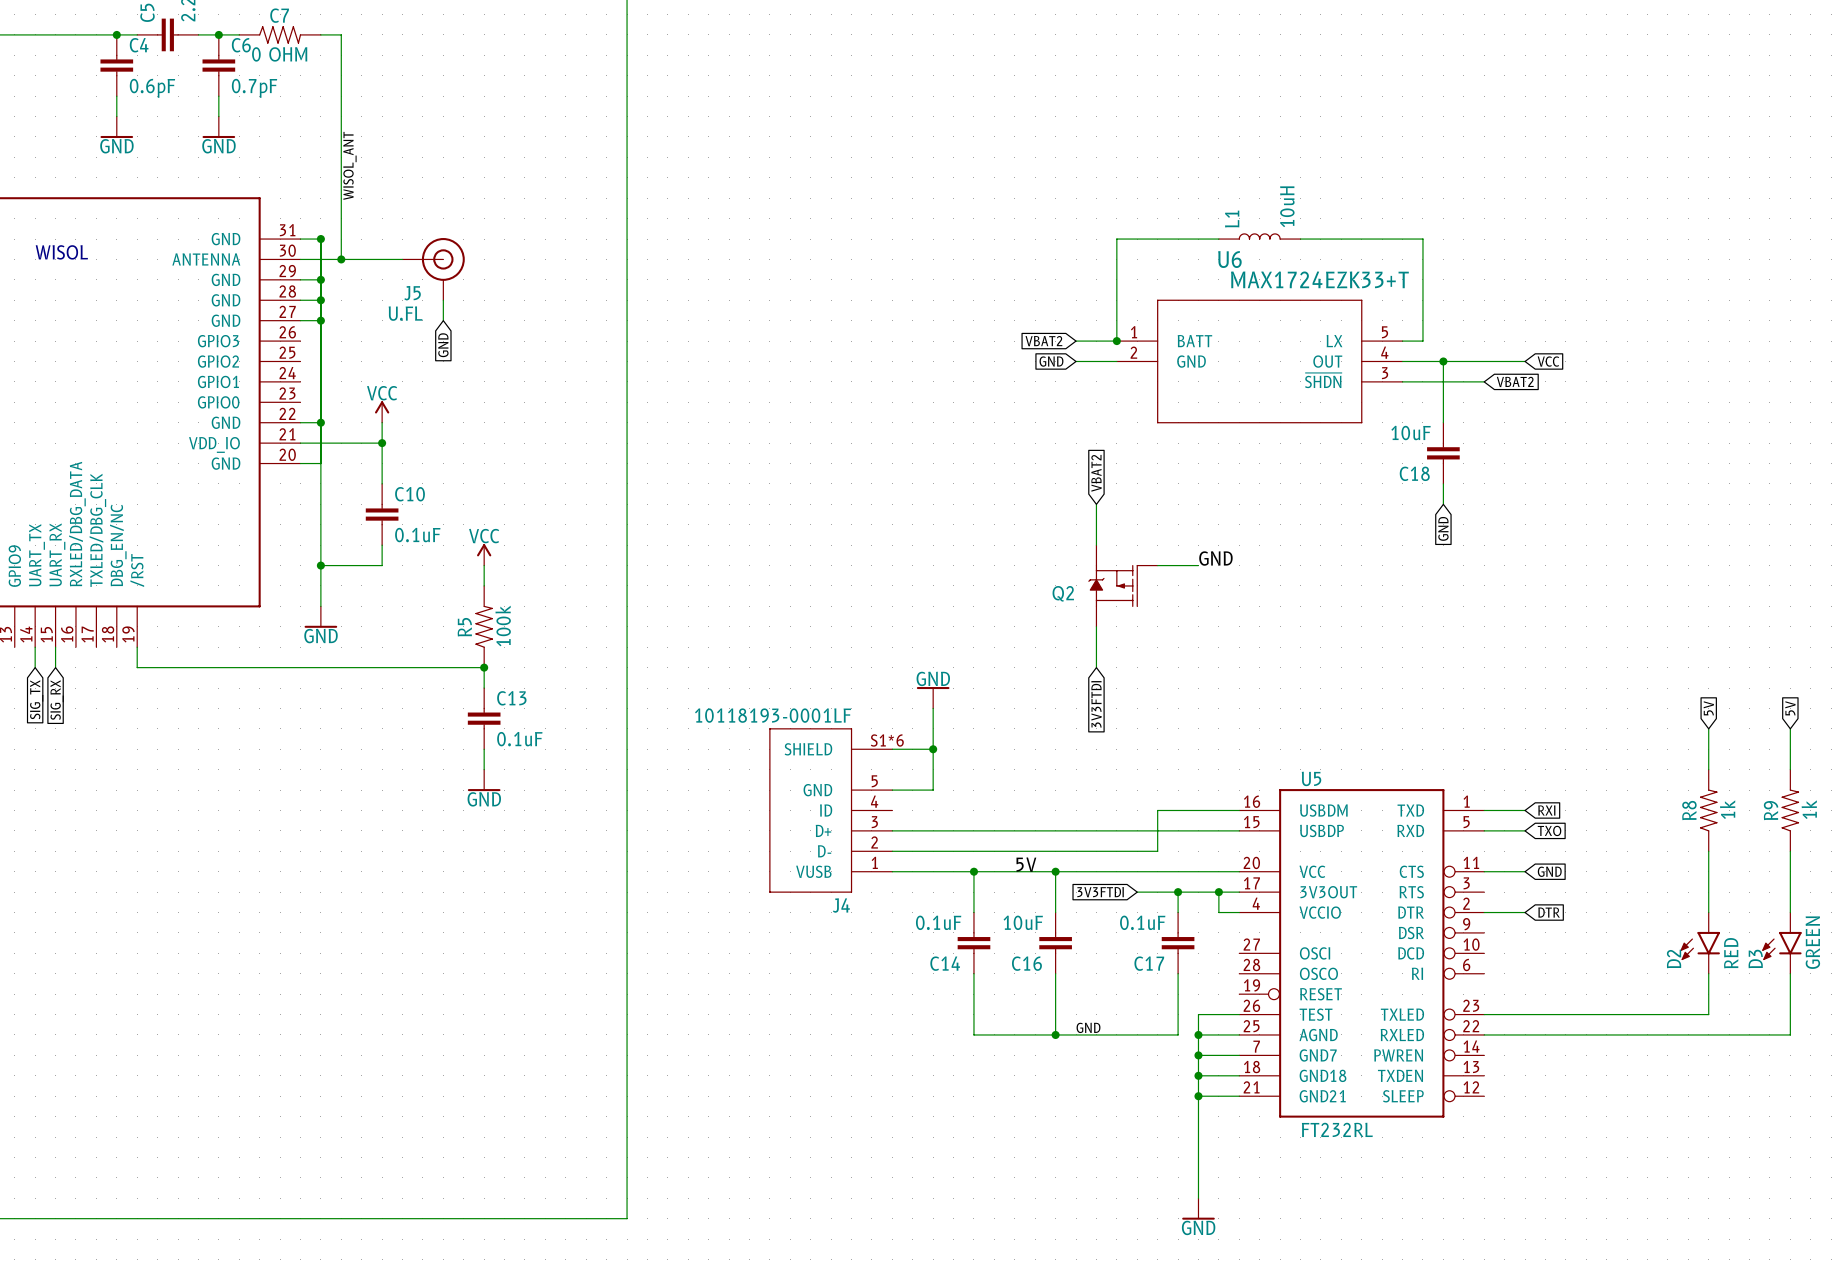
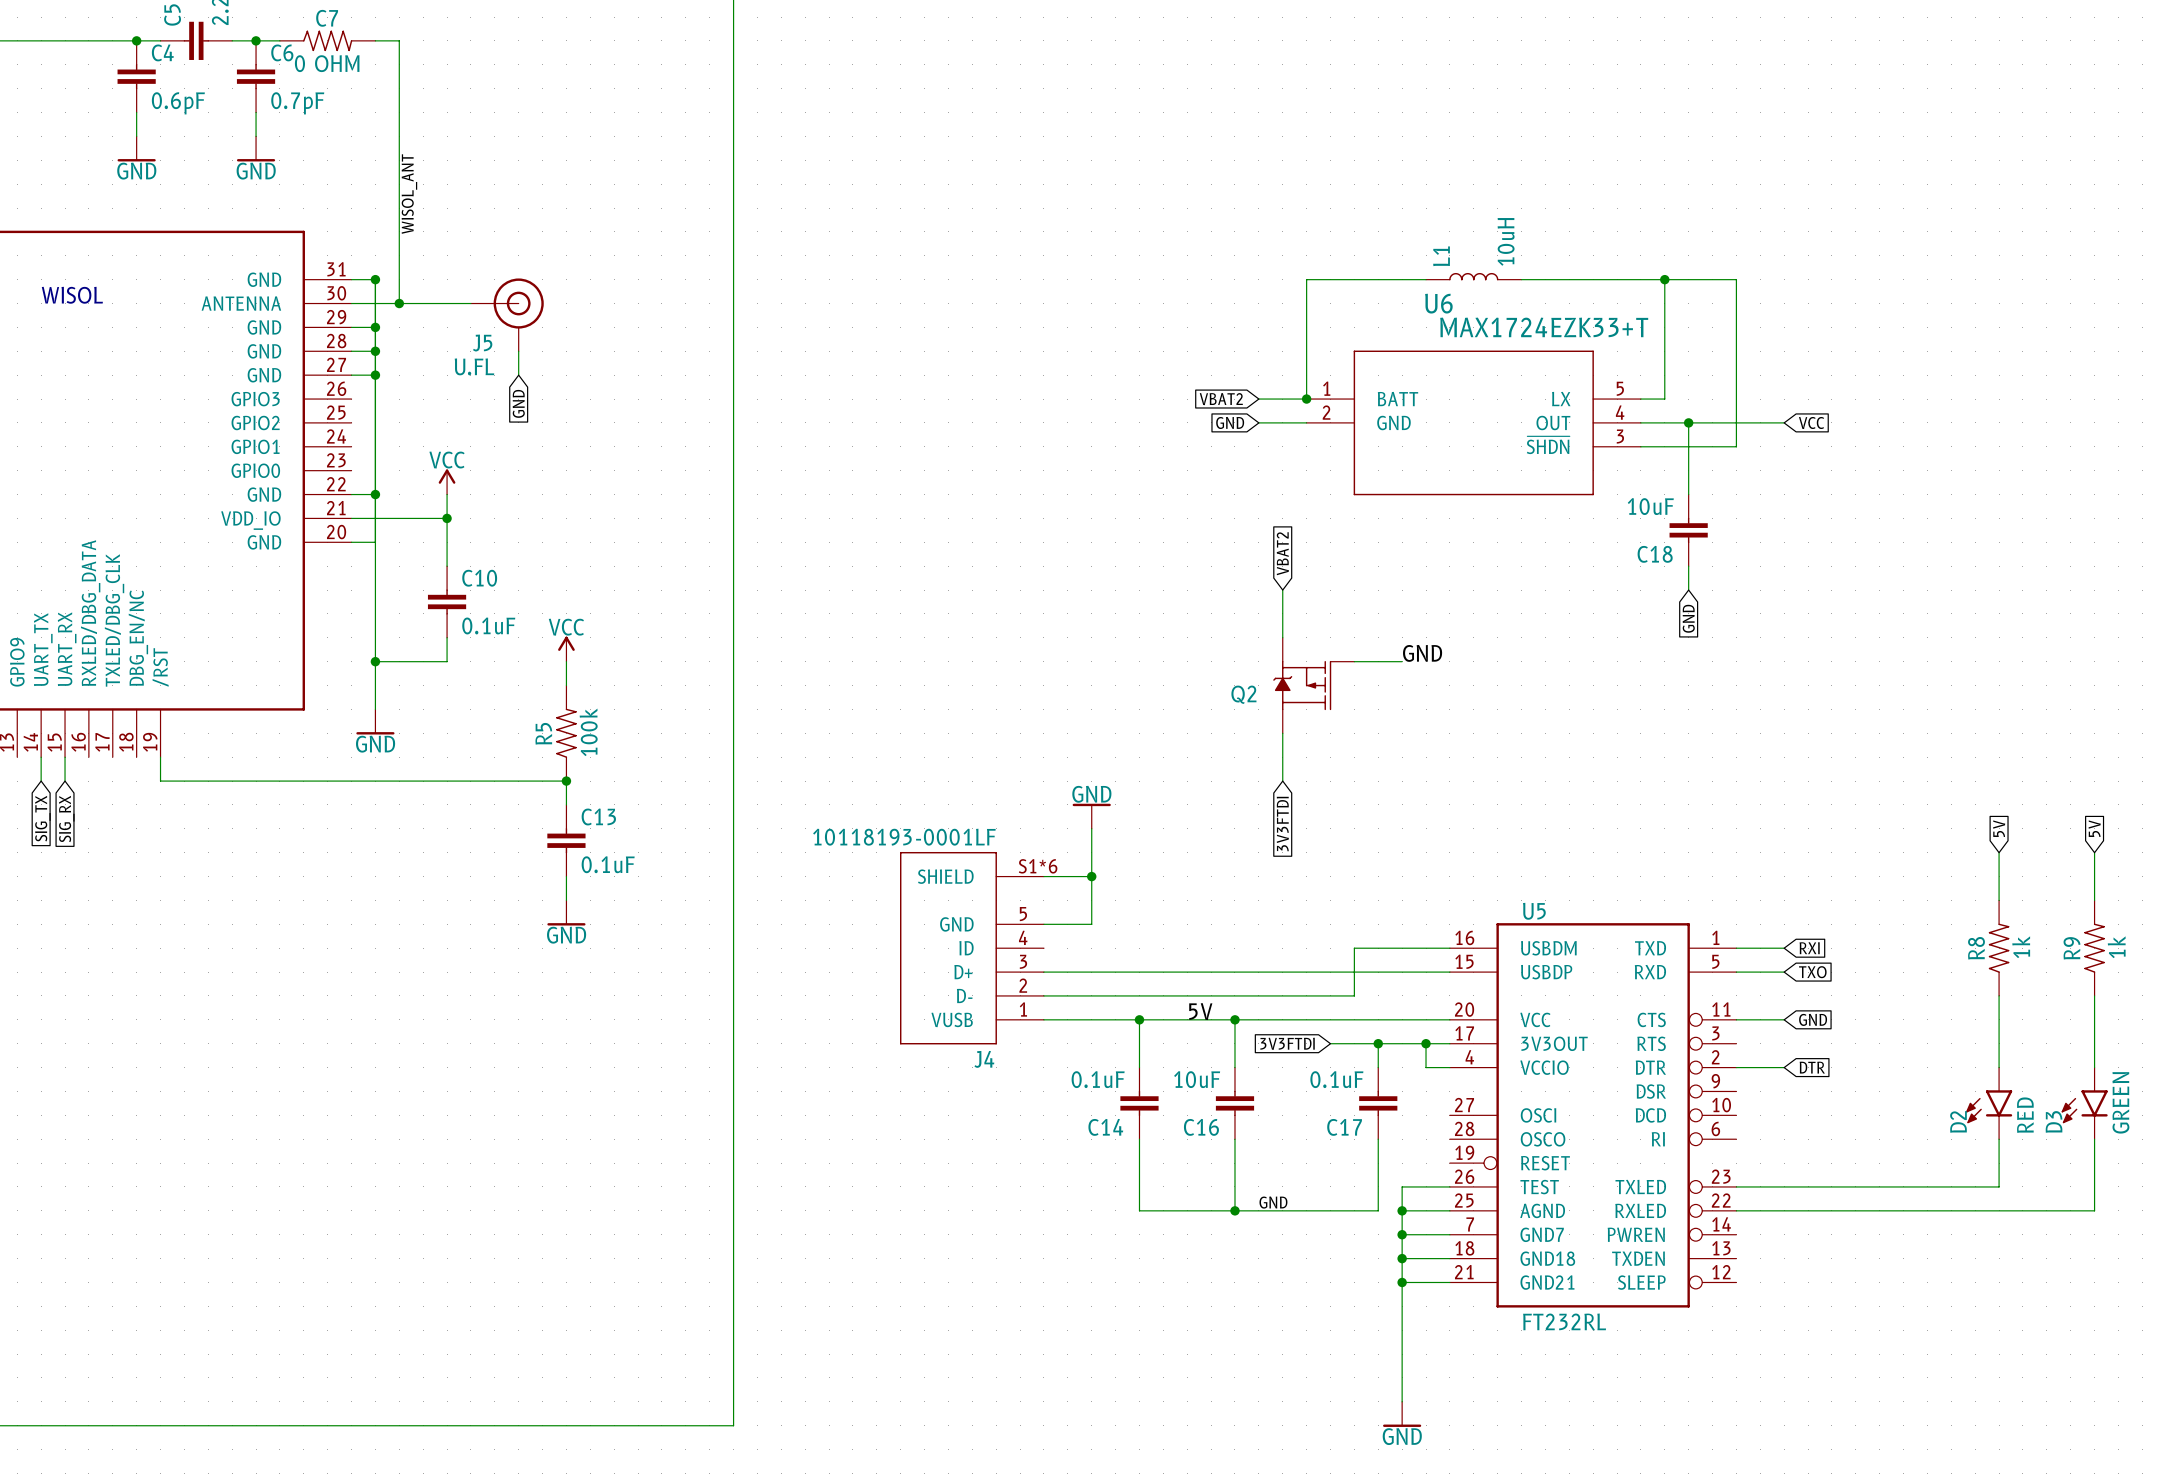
wire: none -> (1664, 279) (1736, 279) (1736, 446)
junction: none -> (1664, 279)
global label: VBAT2 (1515, 381) -> none

